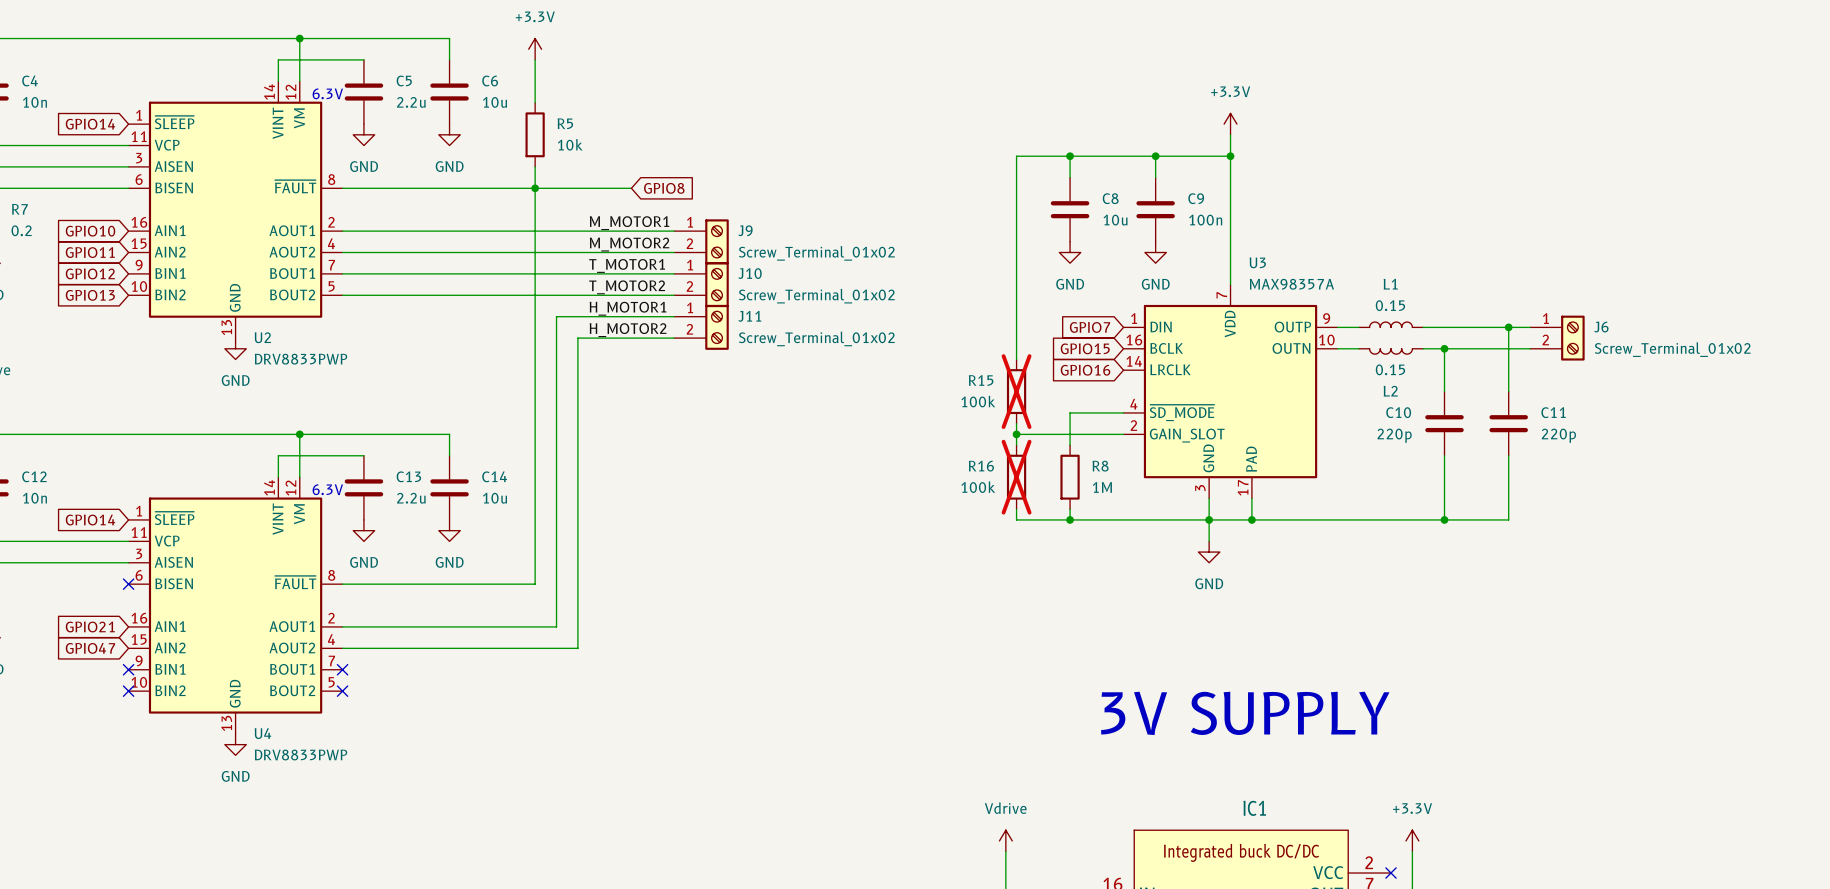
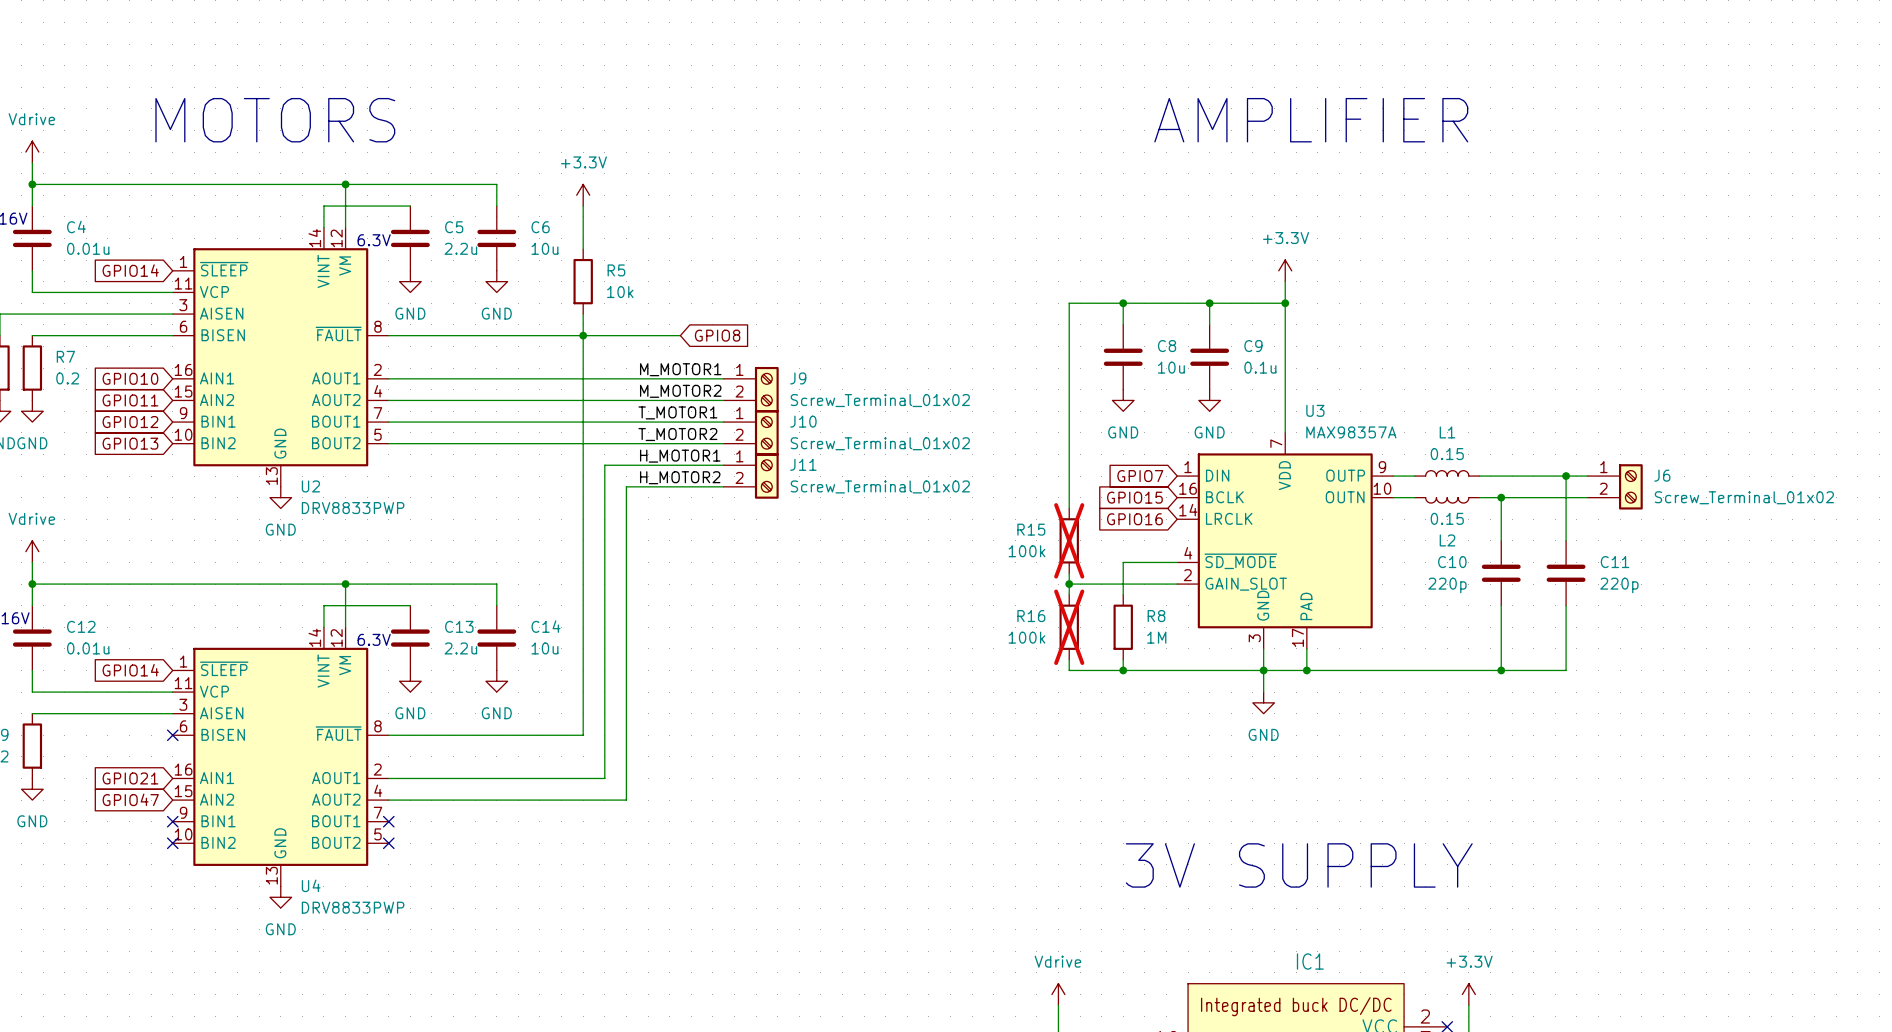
C4 value: 10n (34, 102) -> 0.01u (88, 248)
C9 value: 100n (1205, 220) -> 0.1u (1260, 367)
C12 value: 10n (34, 498) -> 0.01u (88, 648)

